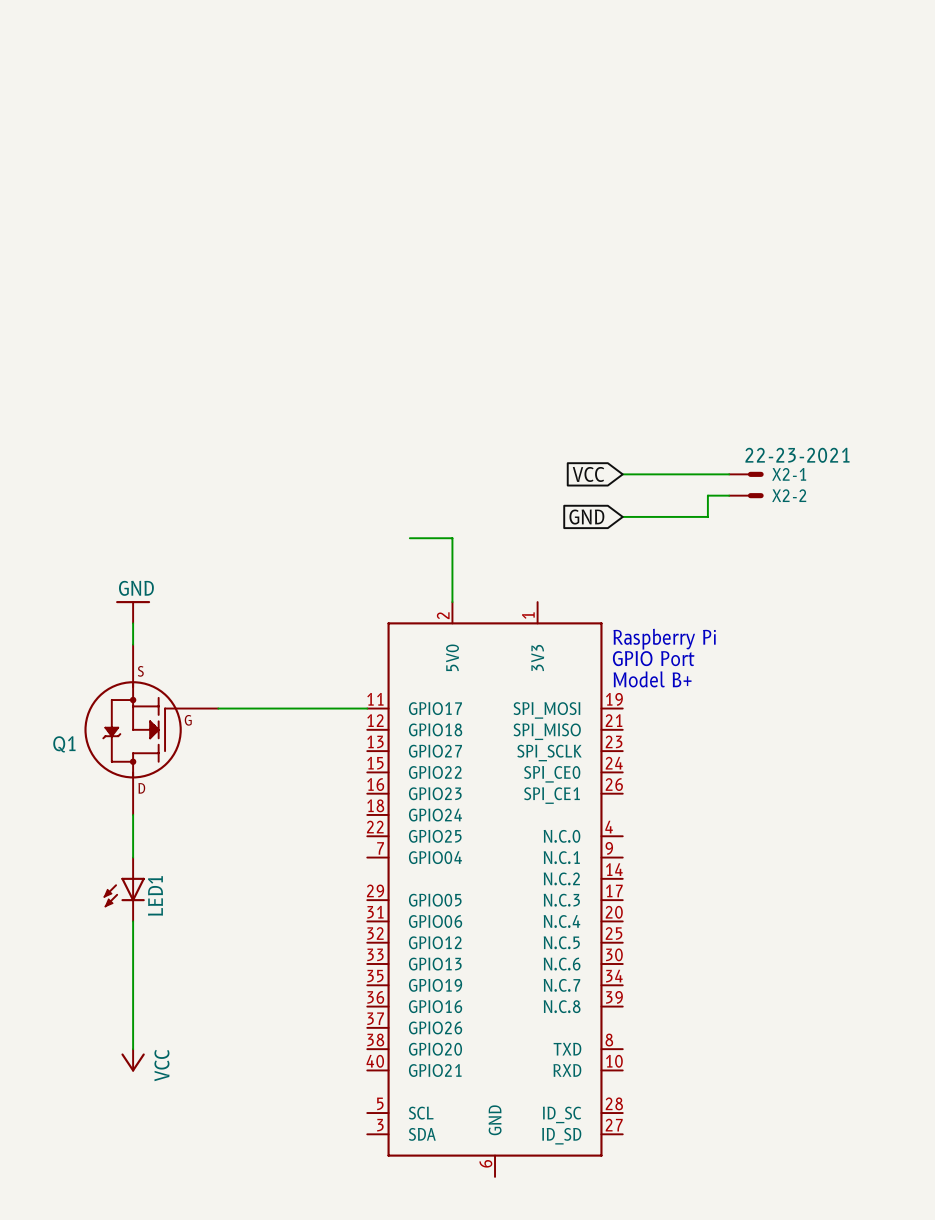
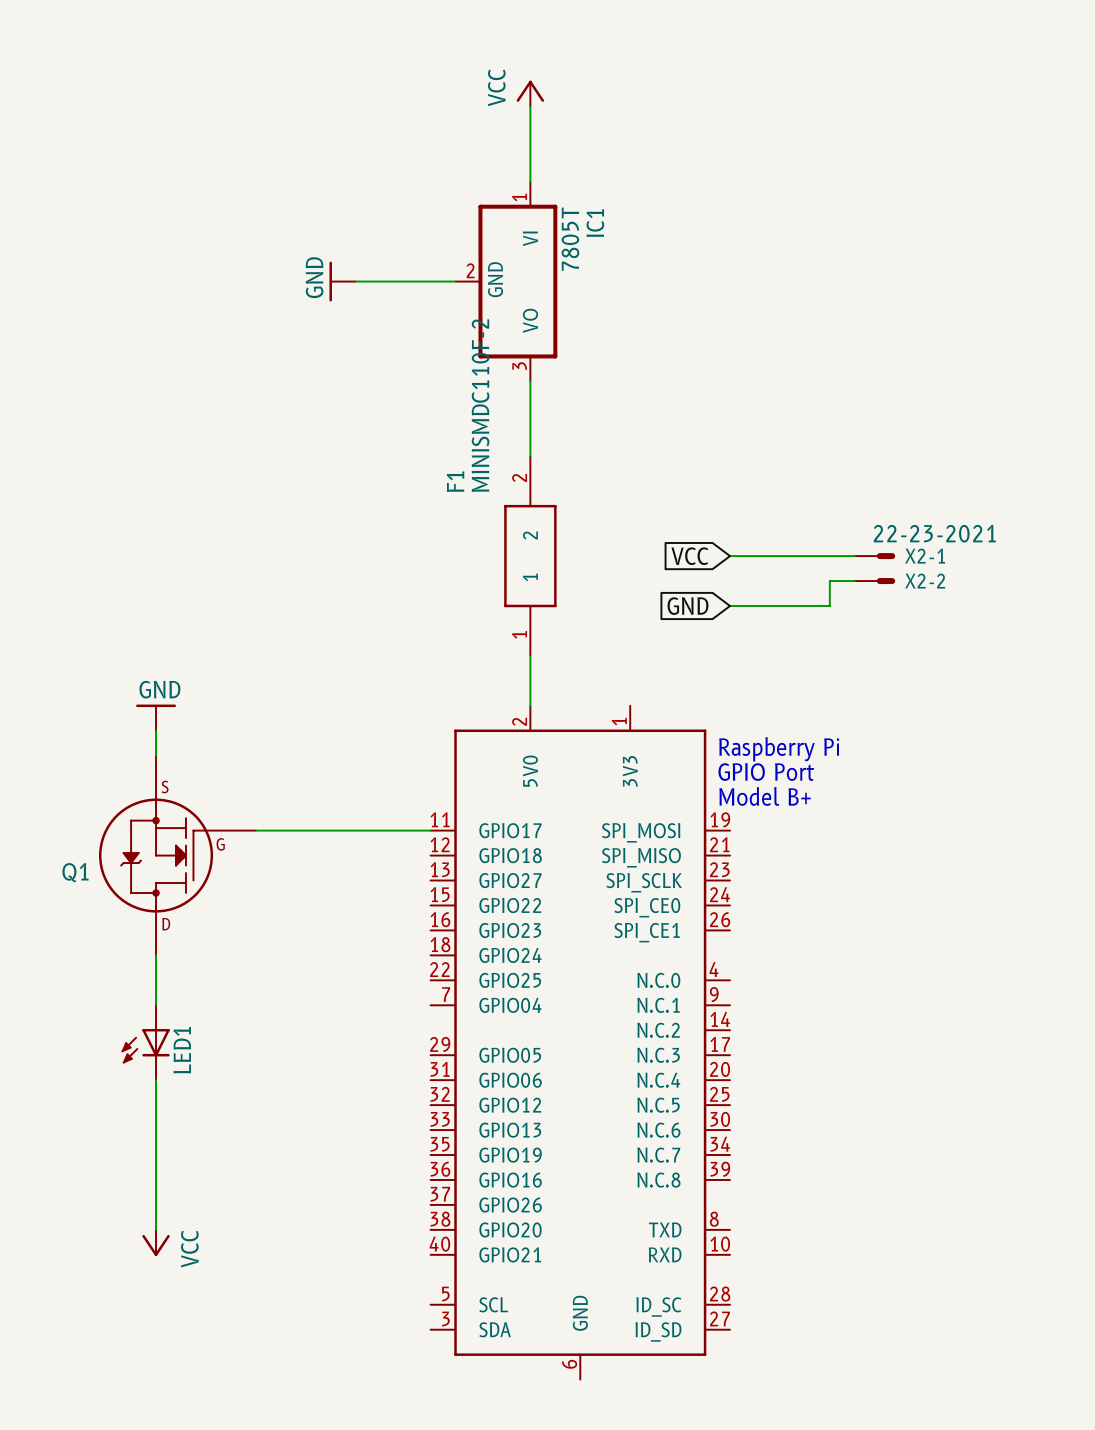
power symbol: none -> VCC (530, 93)
wire: none -> (530, 106) (530, 181)
power symbol: none -> GND (342, 281)
wire: none -> (355, 281) (455, 281)
IC1: none -> 7805T (506, 281)
wire: none -> (530, 381) (530, 456)
F1: none -> MINISMDC110F-2 (530, 556)
wire: (409, 538) (452, 538) (452, 559) -> none

